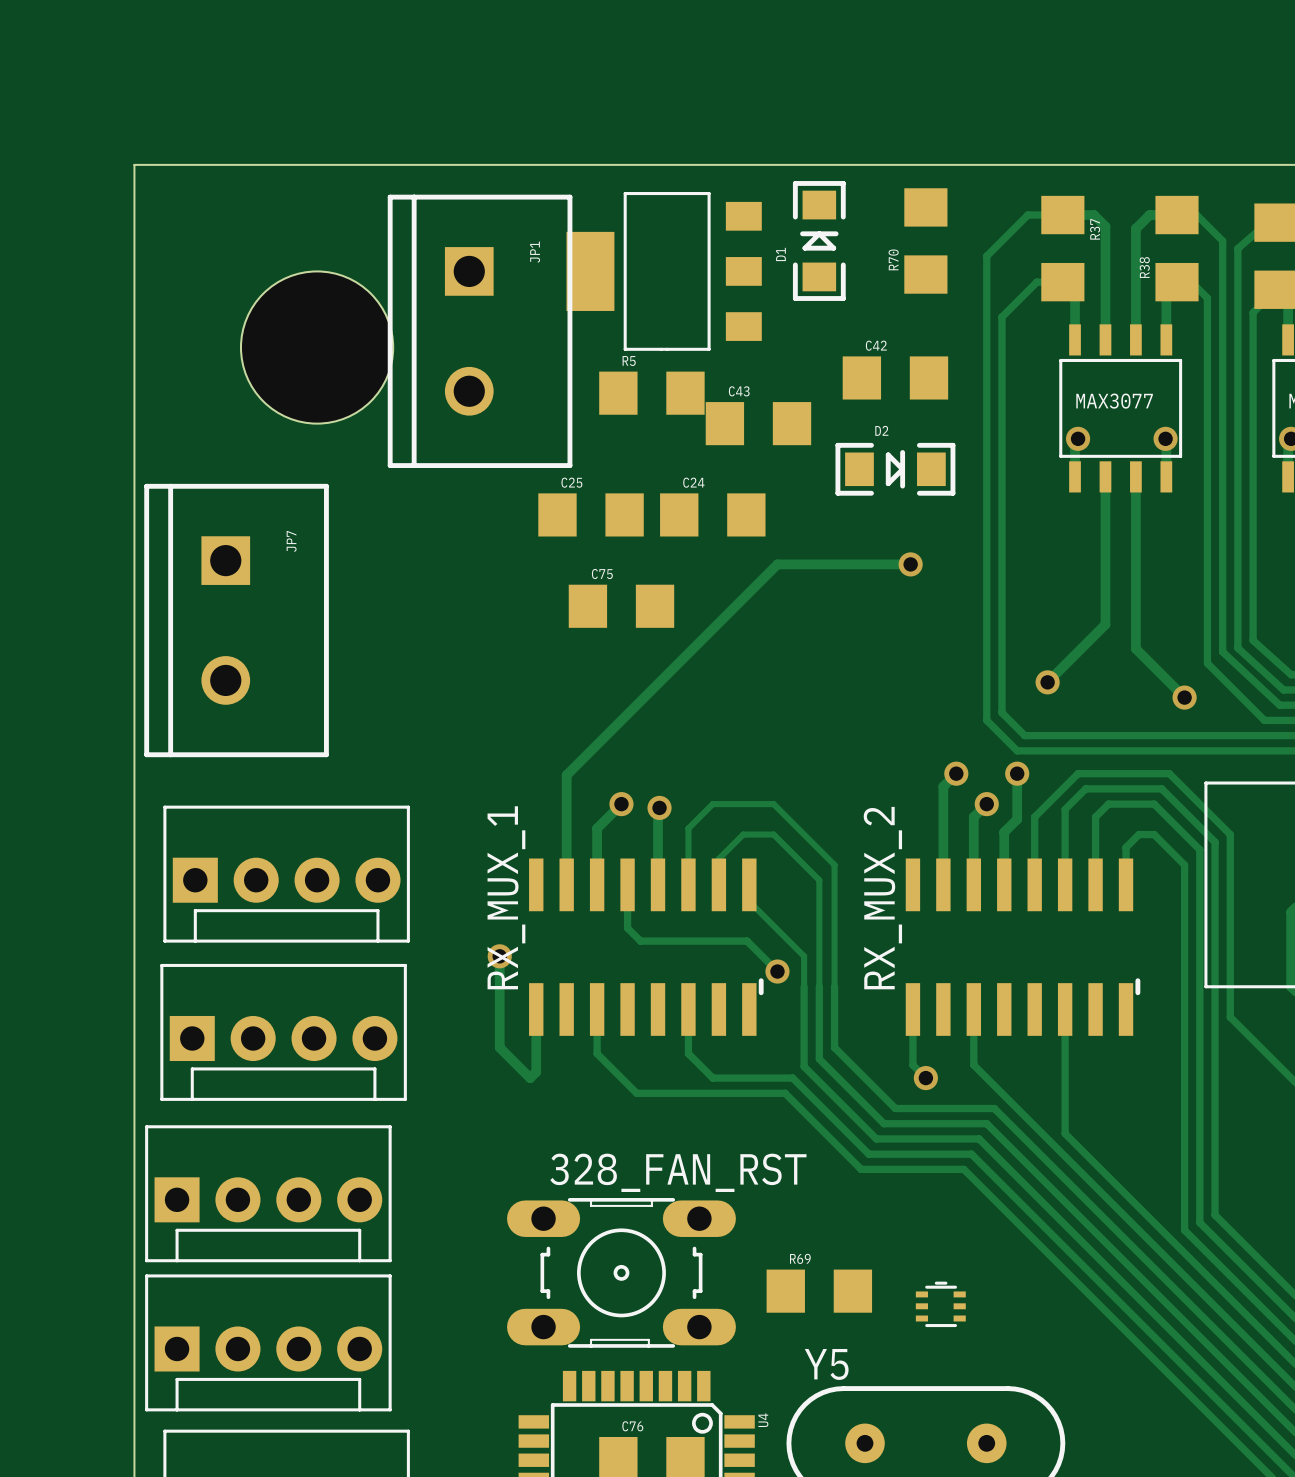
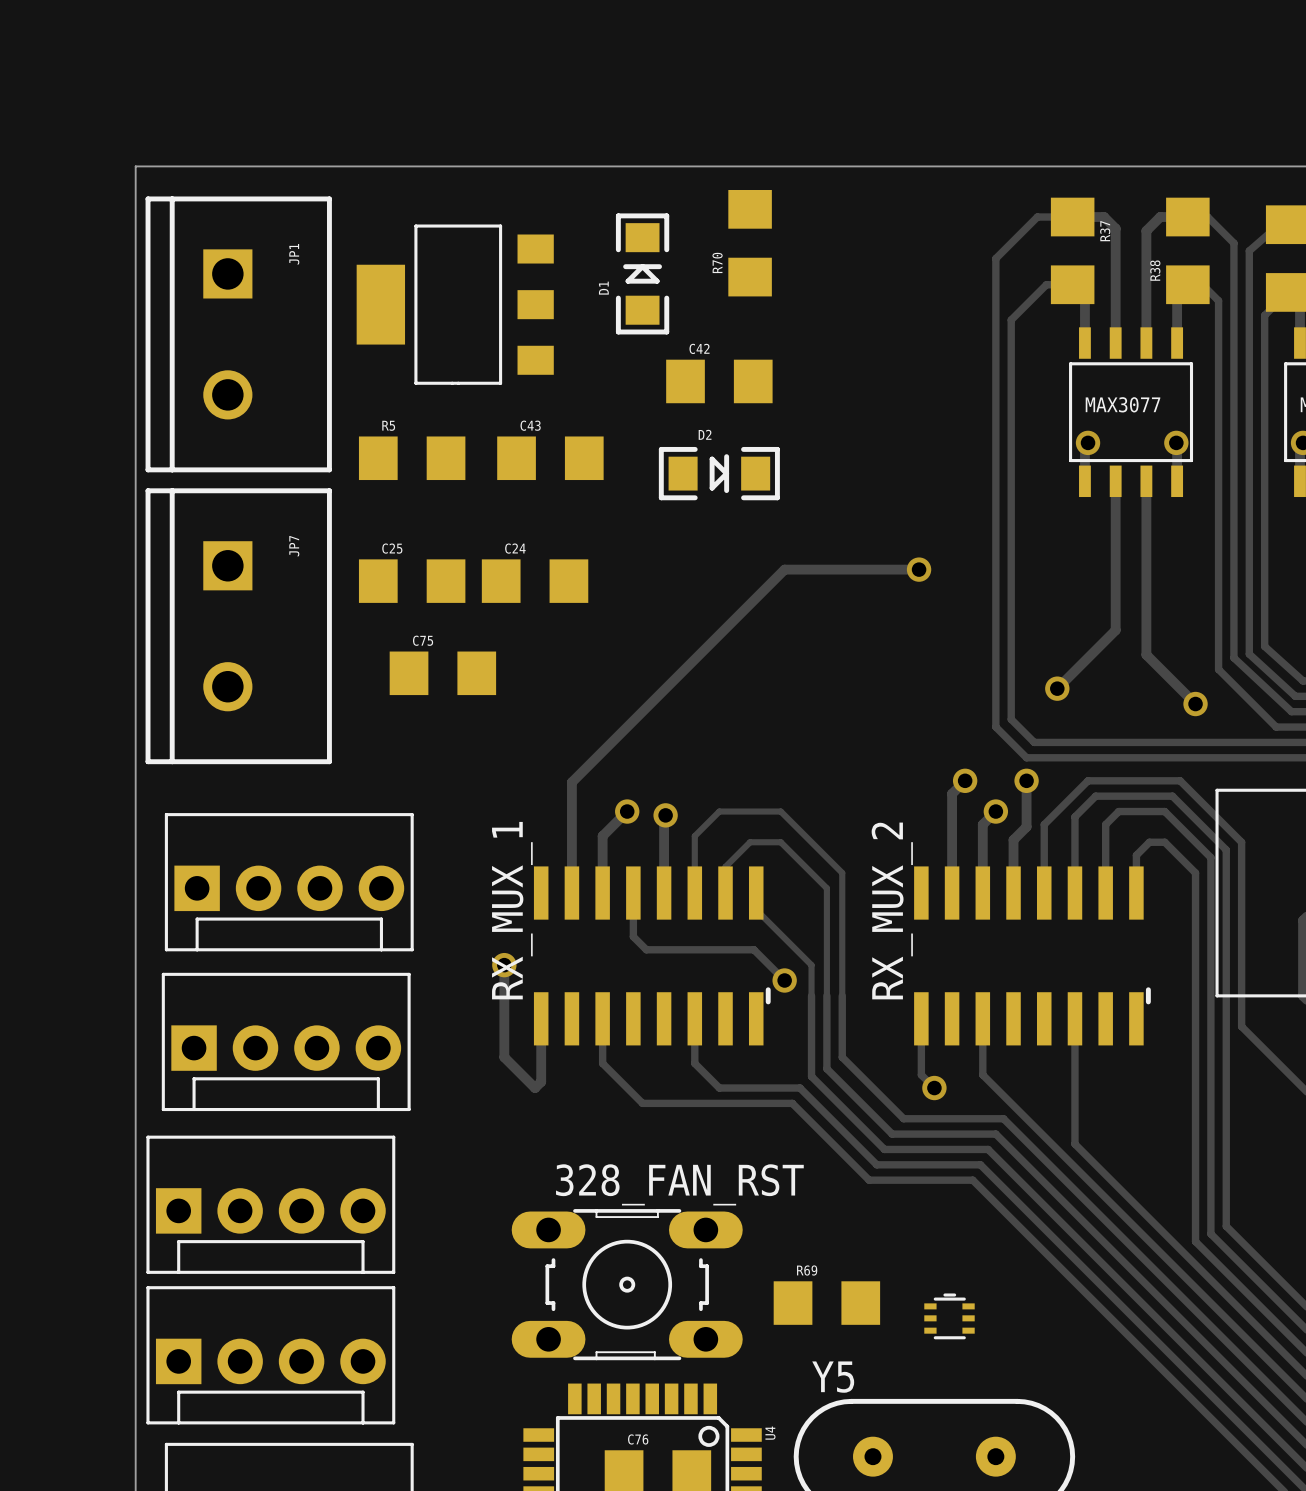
D1 position: (819, 240) -> (642, 273)
R70 position: (925, 240) -> (750, 243)
part position: (664, 271) -> (455, 304)
JP1 position: (480, 331) -> (238, 334)
hole: (317, 347) -> none
C42 position: (895, 377) -> (719, 381)
R5 position: (651, 393) -> (412, 458)
C43 position: (758, 423) -> (550, 458)
D2 position: (895, 469) -> (719, 473)
C25 position: (591, 514) -> (412, 581)
C24 position: (712, 514) -> (535, 581)
C75 position: (621, 606) -> (442, 673)

